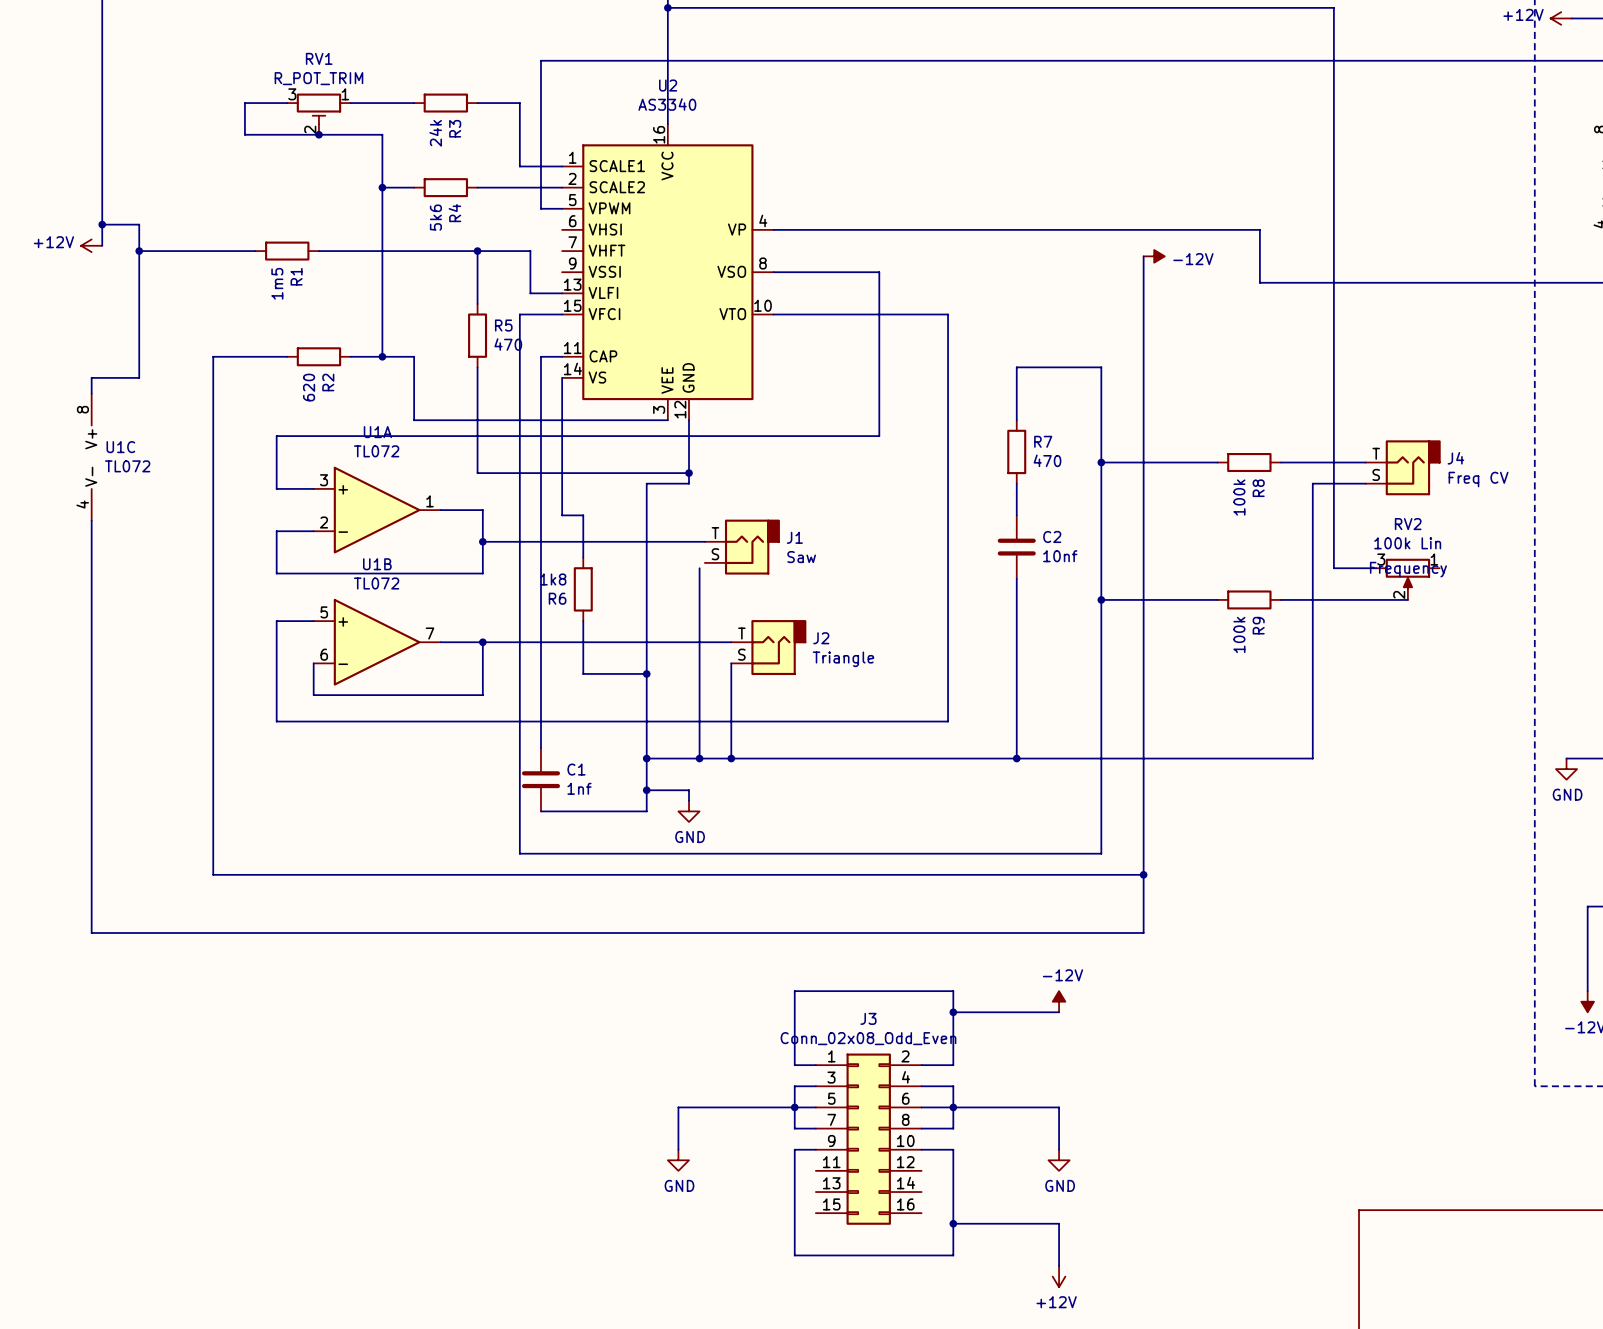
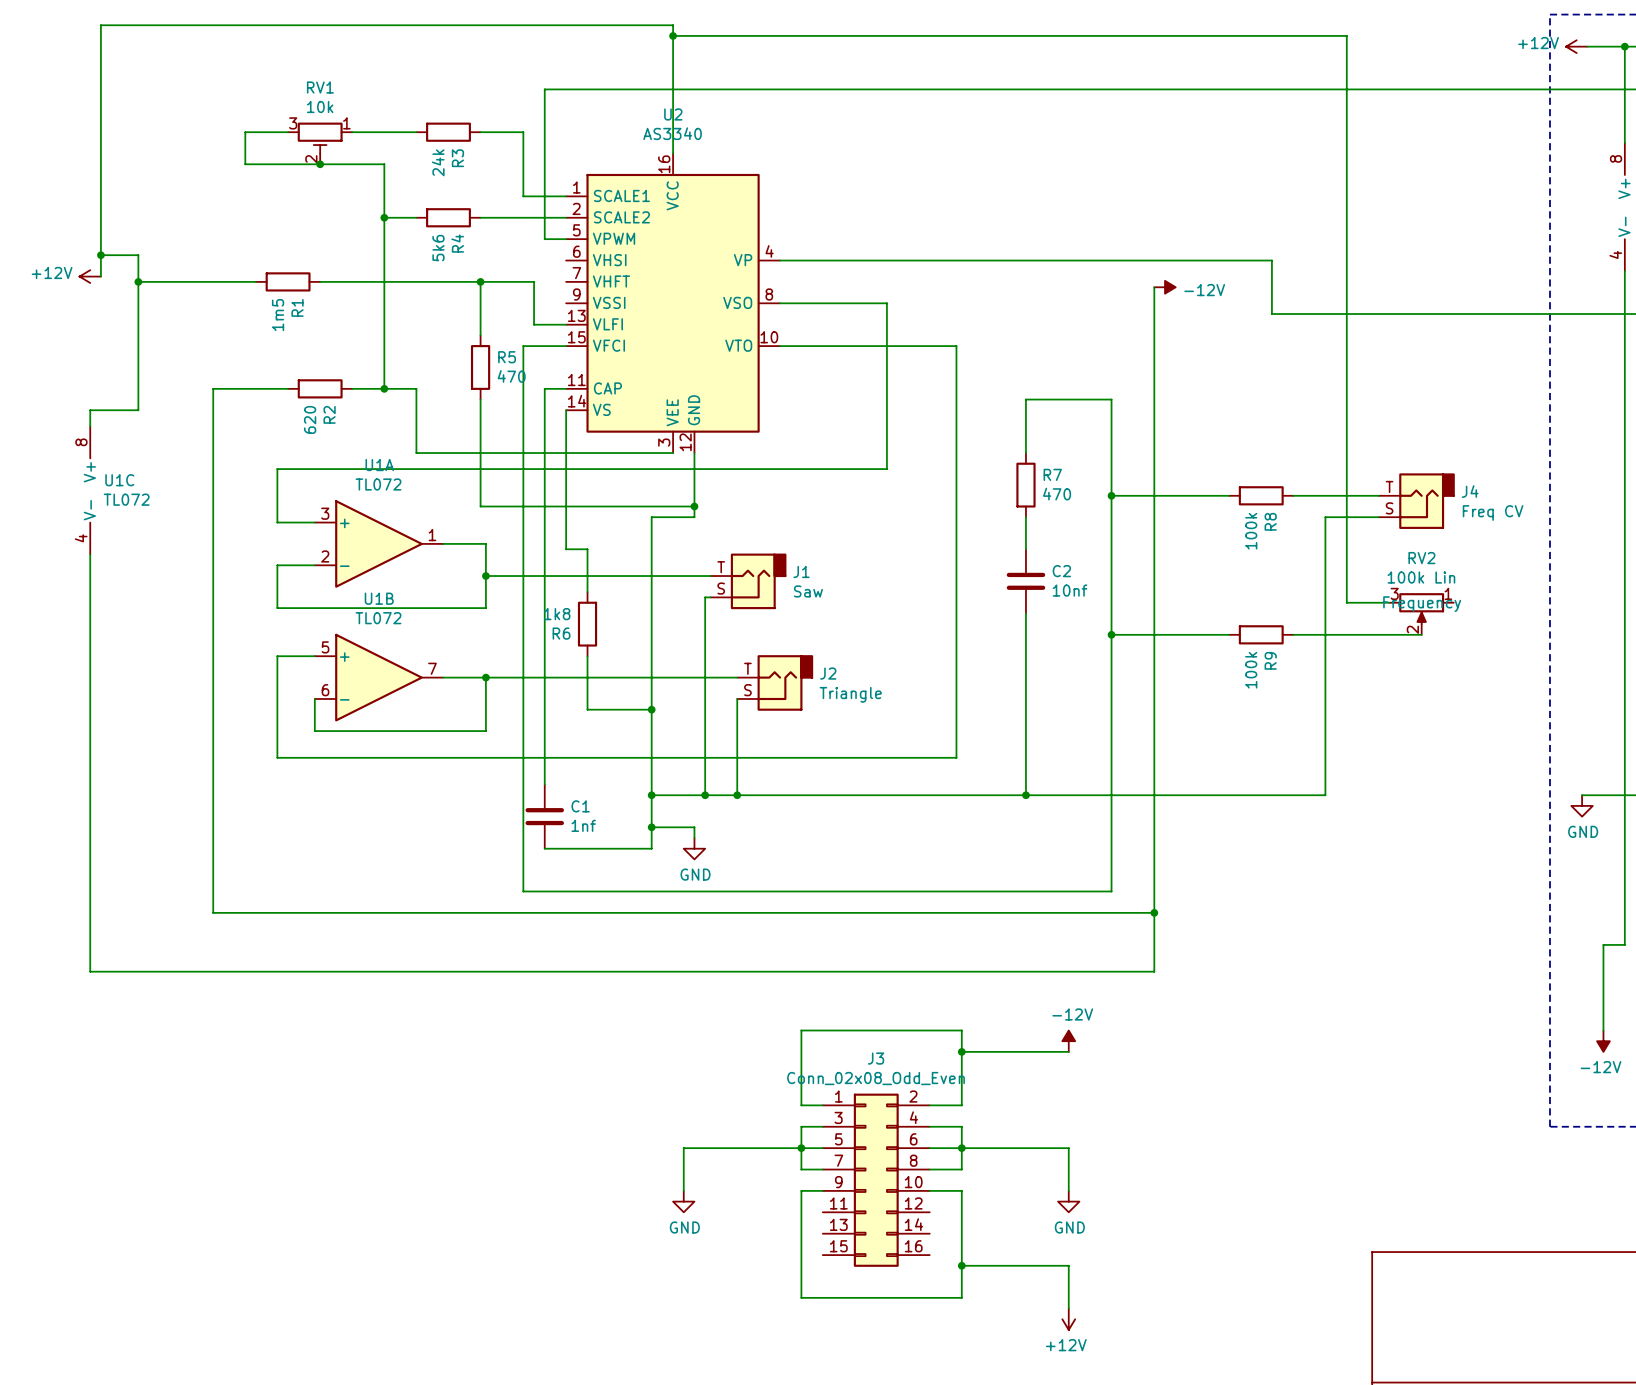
RV1 value: R_POT_TRIM (318, 78) -> 10k (320, 106)
wire: none -> (710, 597) (705, 597) (705, 602)

